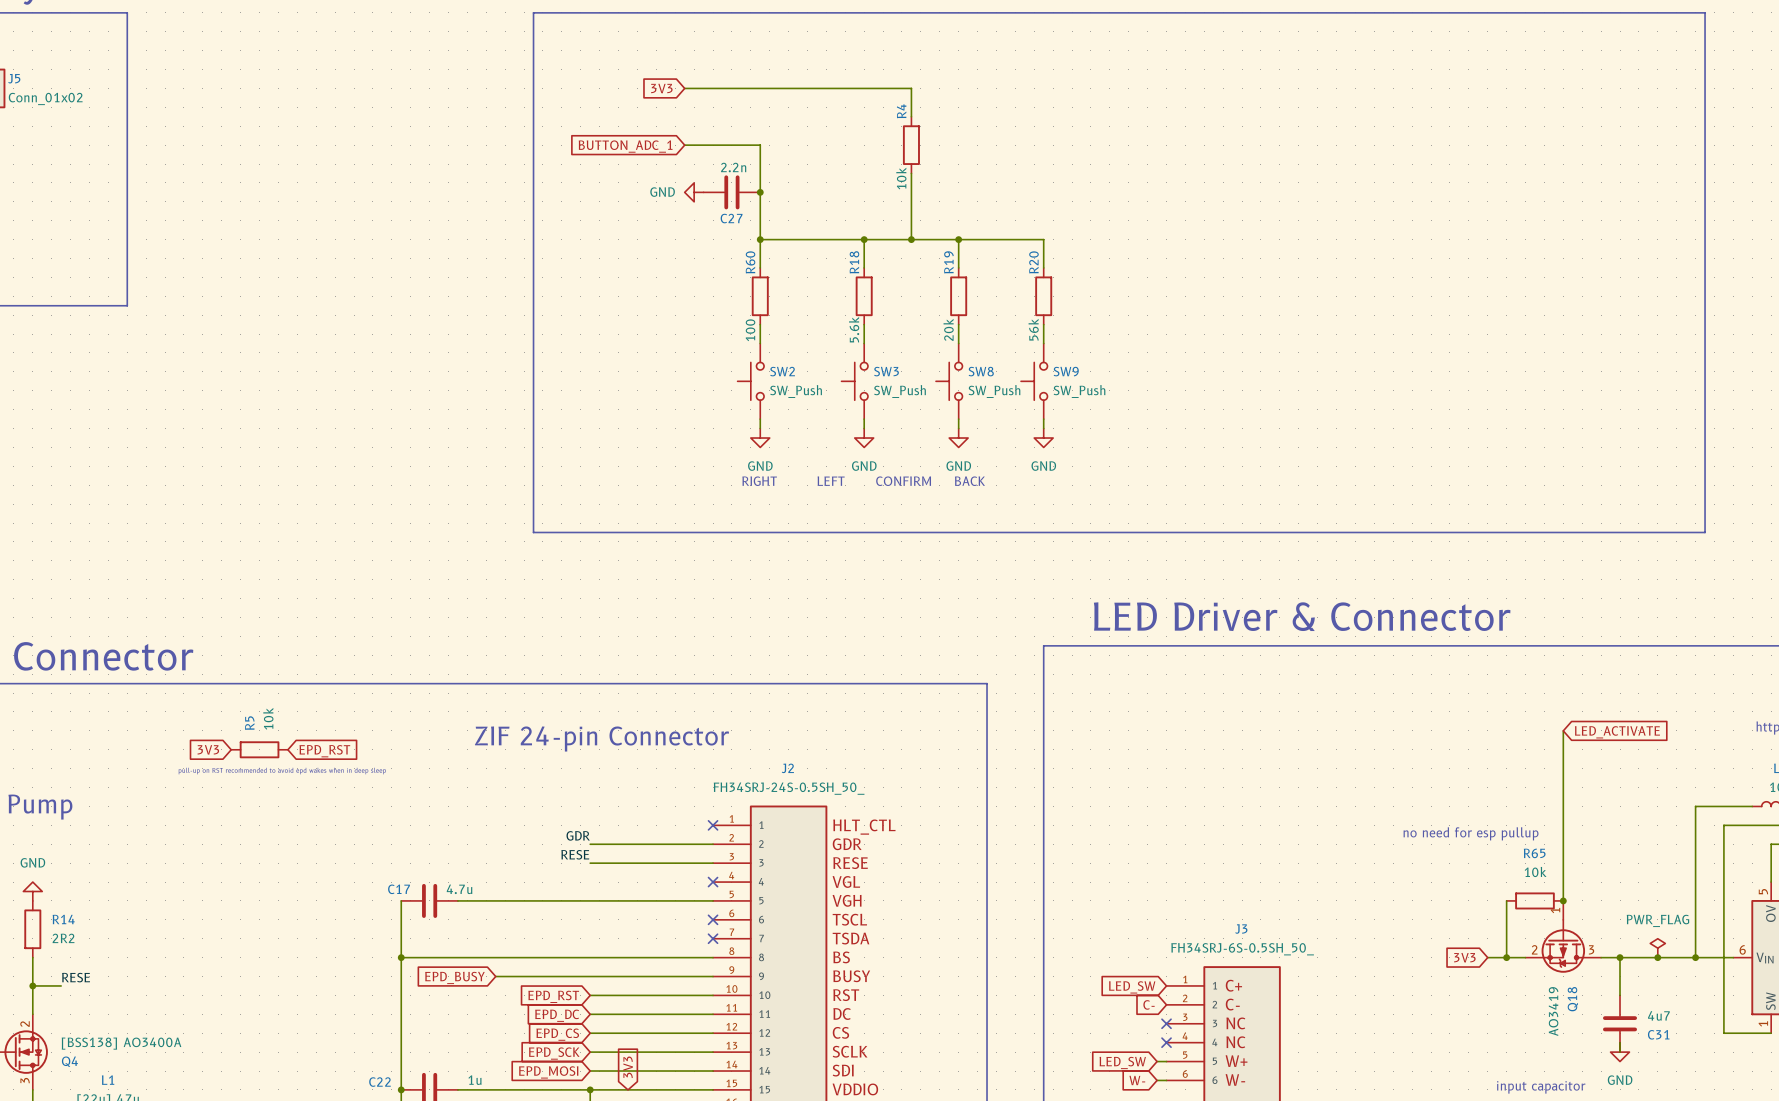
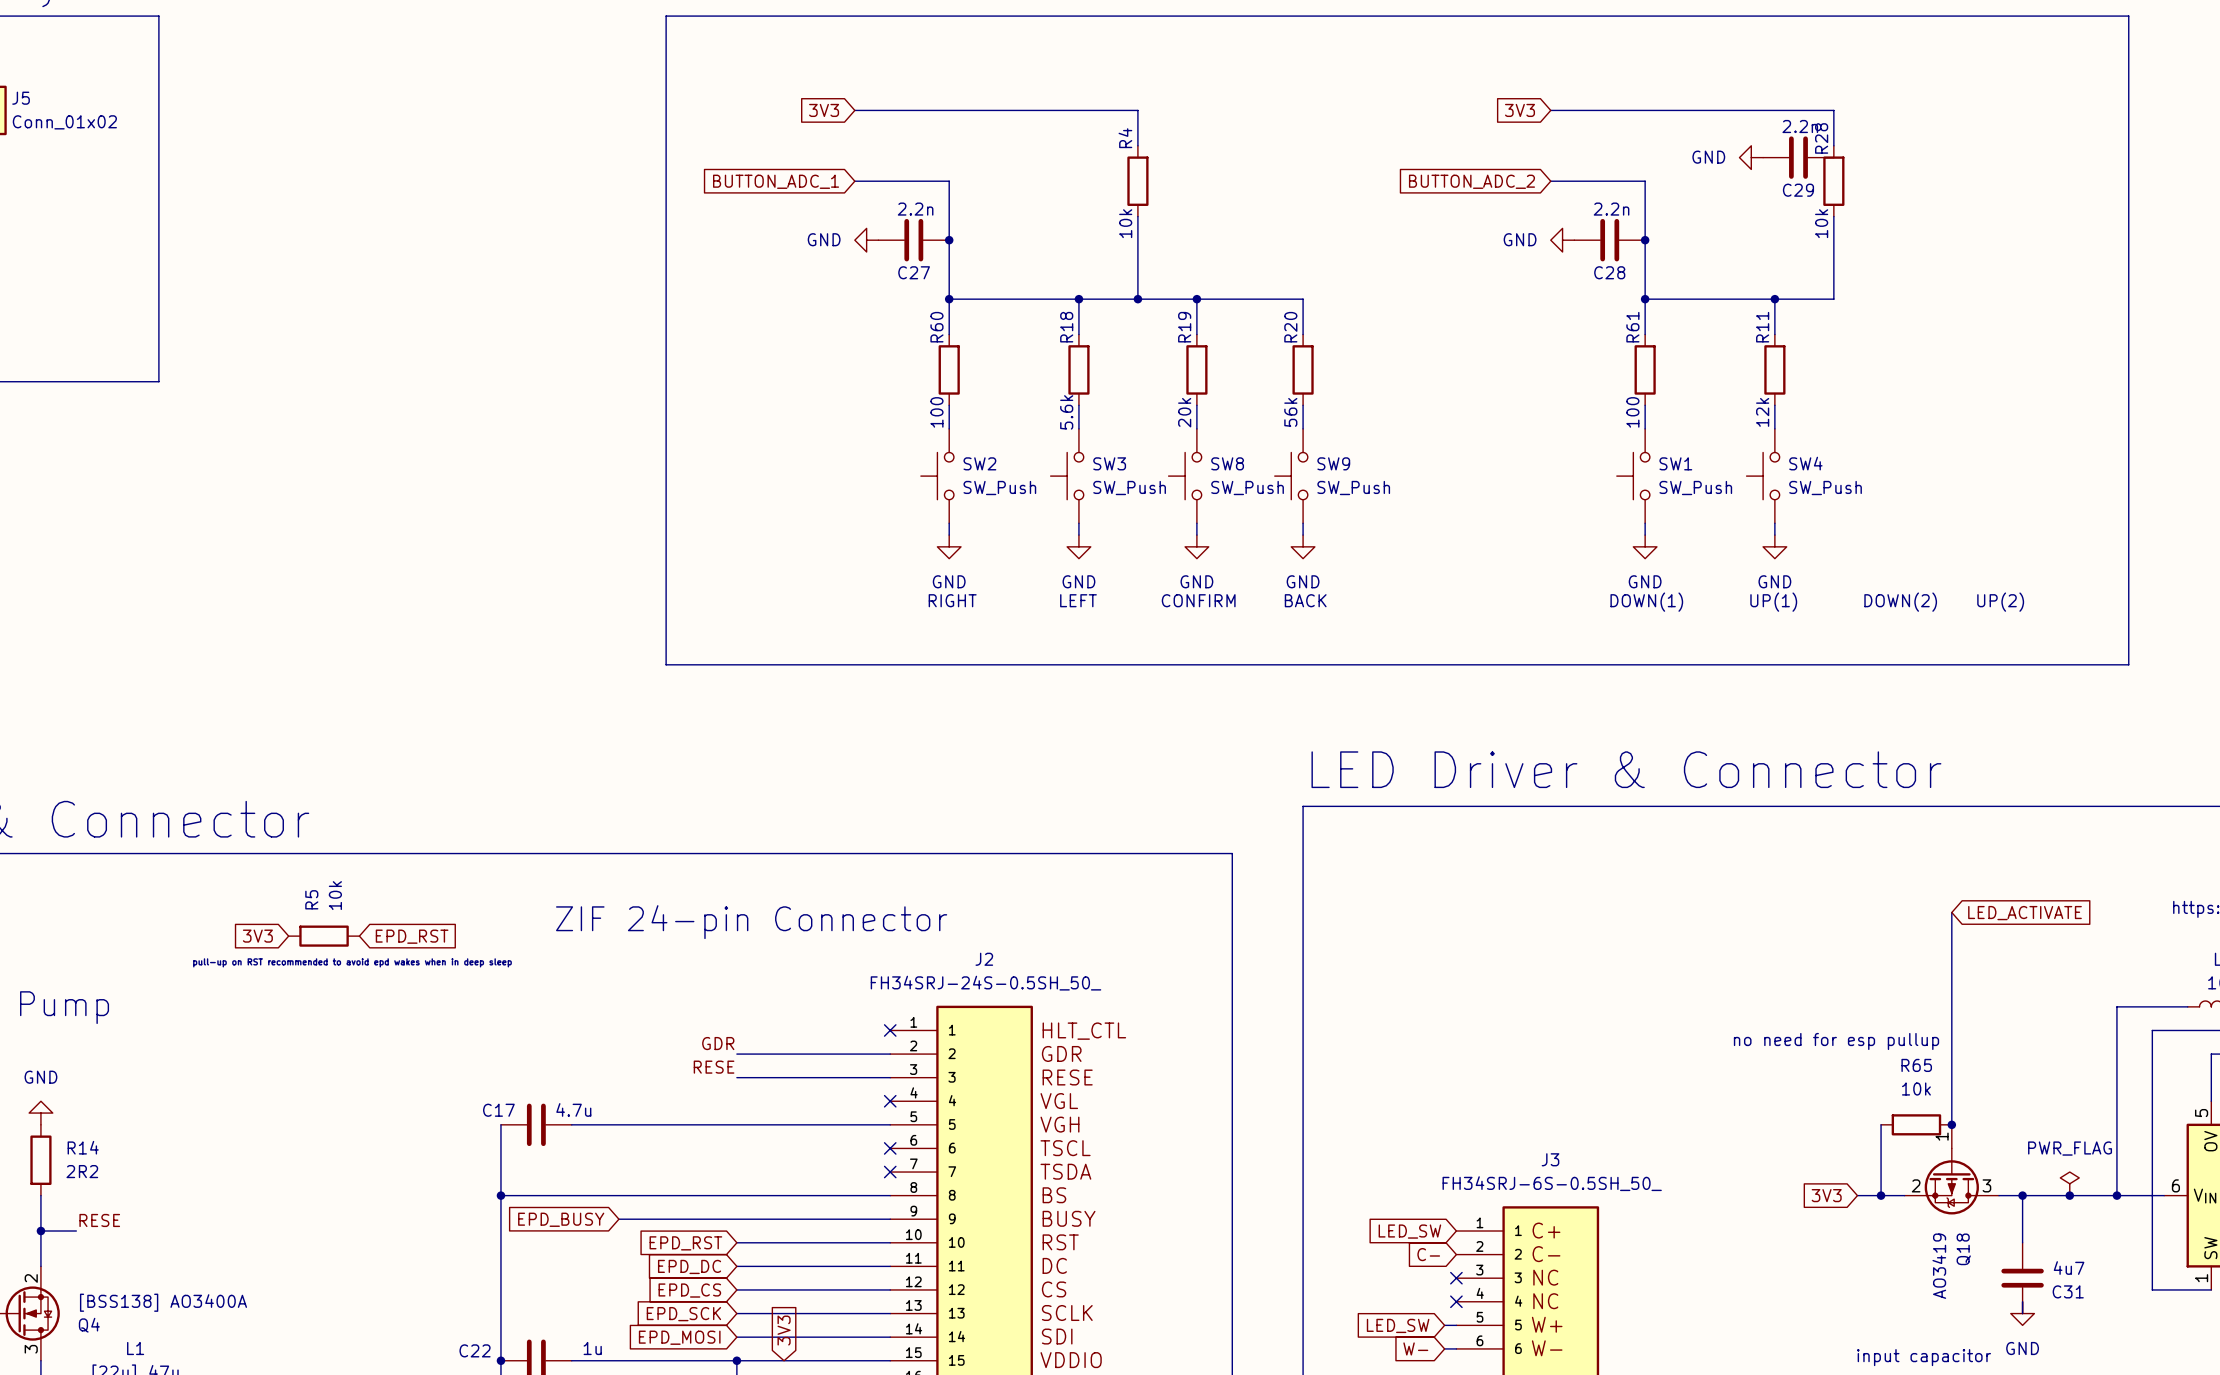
global label: none -> 3V3 (1520, 110)
wire: none -> (1550, 110) (1833, 110) (1833, 145)
power symbol: none -> GND (1751, 157)
C29: none -> 2.2n (1798, 157)
wire: none -> (1550, 181) (1645, 181) (1645, 334)
R28: none -> 10k (1833, 181)
global label: none -> BUTTON_ADC_2 (1471, 181)
wire: none -> (1833, 216) (1833, 299) (1645, 299)
power symbol: none -> GND (1562, 240)
C28: none -> 2.2n (1609, 240)
junction: none -> (1645, 240)
junction: none -> (1645, 299)
wire: none -> (1774, 299) (1774, 334)
junction: none -> (1774, 299)
R61: none -> 100 (1645, 369)
R11: none -> 12k (1774, 369)
wire: none -> (1645, 405) (1645, 428)
wire: none -> (1774, 405) (1774, 428)
SW1: none -> SW_Push (1633, 476)
SW4: none -> SW_Push (1763, 476)
wire: none -> (1645, 523) (1645, 535)
wire: none -> (1774, 523) (1774, 535)
power symbol: none -> GND (1645, 546)
power symbol: none -> GND (1774, 546)
text: none -> DOWN(1) UP(1) DOWN(2) UP(2) (1817, 602)

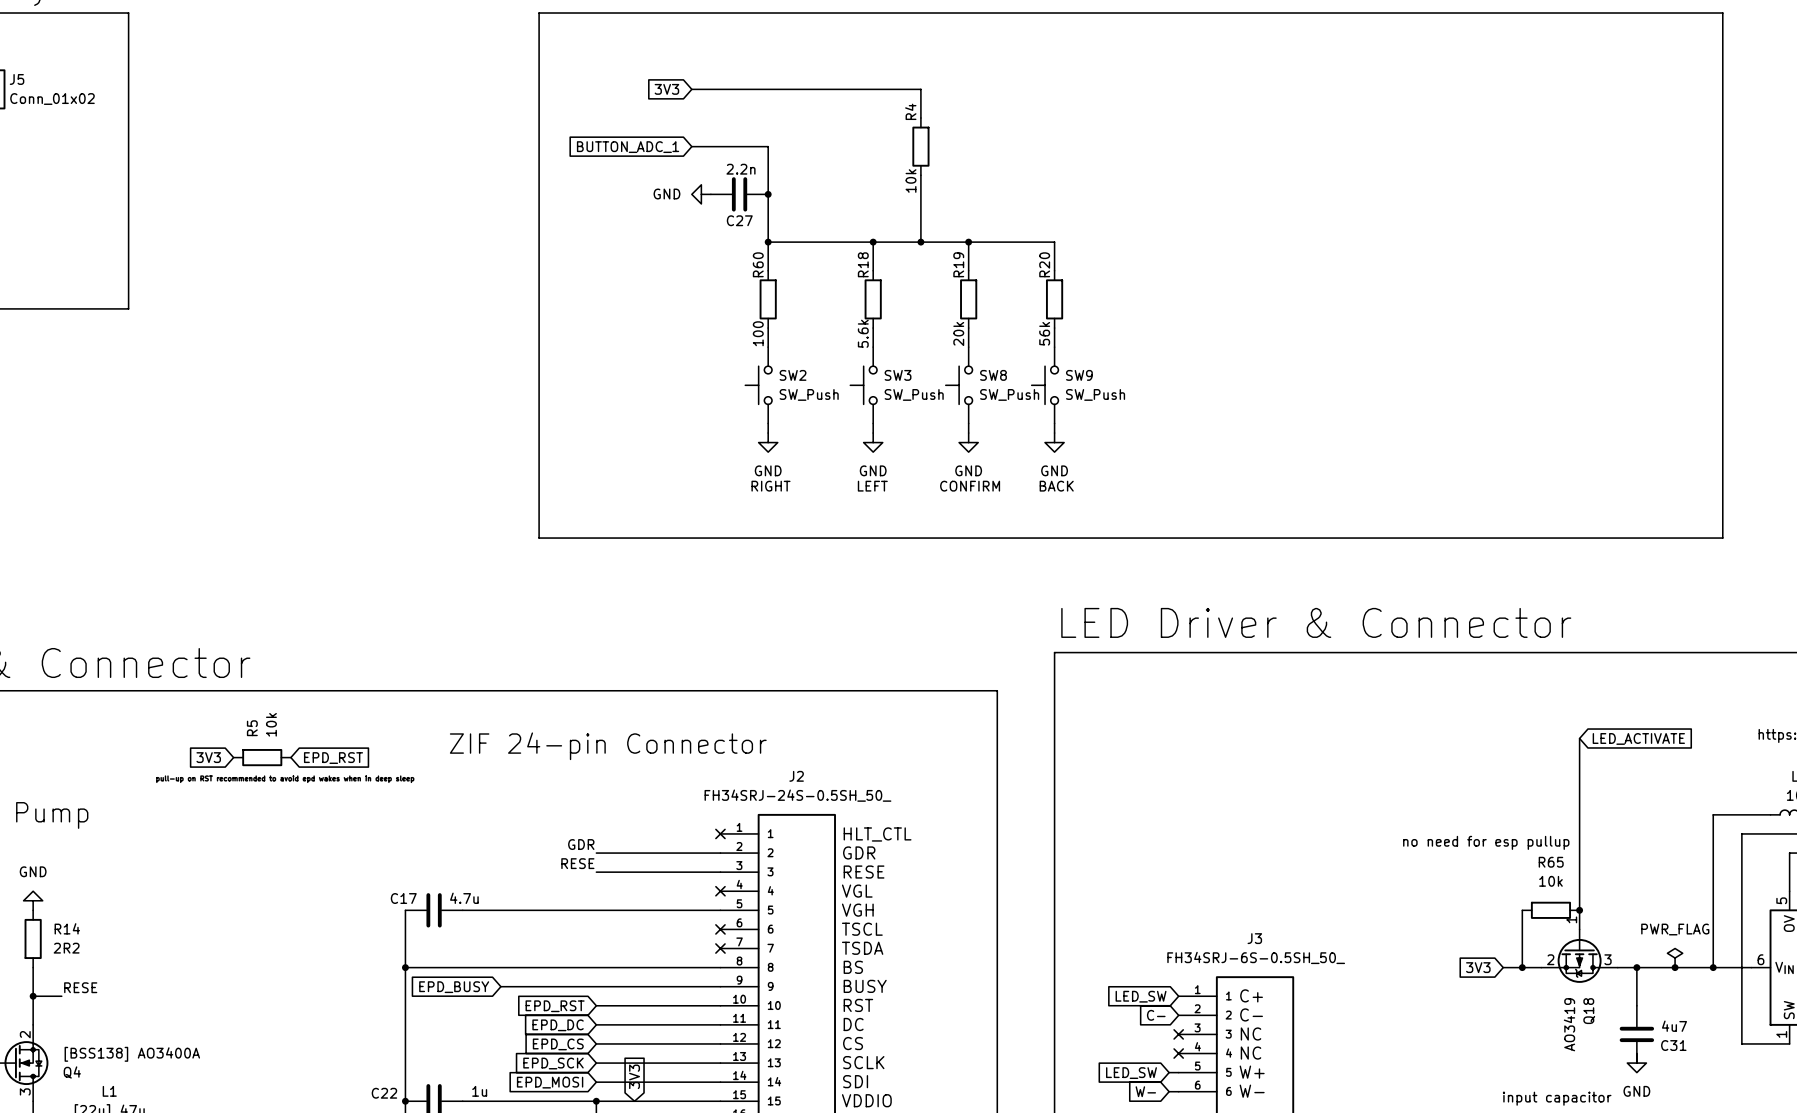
global label: 3V3 (1520, 110) -> none
wire: (1550, 110) (1833, 110) (1833, 145) -> none
power symbol: GND (1751, 157) -> none
C29: 2.2n (1798, 157) -> none
global label: BUTTON_ADC_2 (1471, 181) -> none
wire: (1550, 181) (1645, 181) (1645, 334) -> none
R28: 10k (1833, 181) -> none
wire: (1833, 216) (1833, 299) (1645, 299) -> none
power symbol: GND (1562, 240) -> none
C28: 2.2n (1609, 240) -> none
junction: (1645, 240) -> none
junction: (1645, 299) -> none
wire: (1774, 299) (1774, 334) -> none
junction: (1774, 299) -> none
R61: 100 (1645, 369) -> none
R11: 12k (1774, 369) -> none
wire: (1645, 405) (1645, 428) -> none
wire: (1774, 405) (1774, 428) -> none
SW1: SW_Push (1633, 476) -> none
SW4: SW_Push (1763, 476) -> none
wire: (1645, 523) (1645, 535) -> none
wire: (1774, 523) (1774, 535) -> none
power symbol: GND (1645, 546) -> none
power symbol: GND (1774, 546) -> none
text: DOWN(1) UP(1) DOWN(2) UP(2) (1817, 602) -> none

